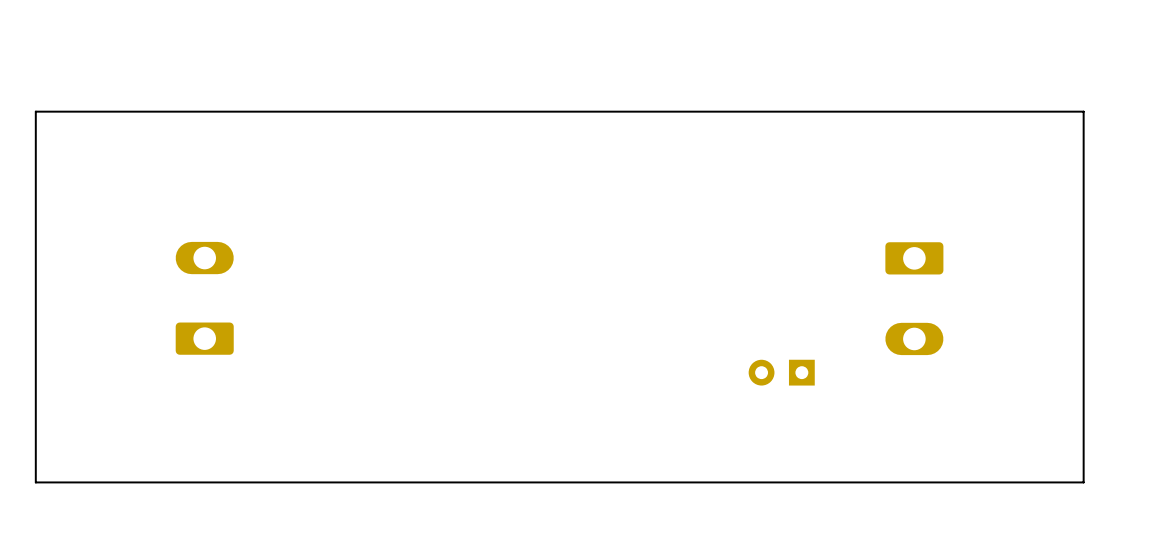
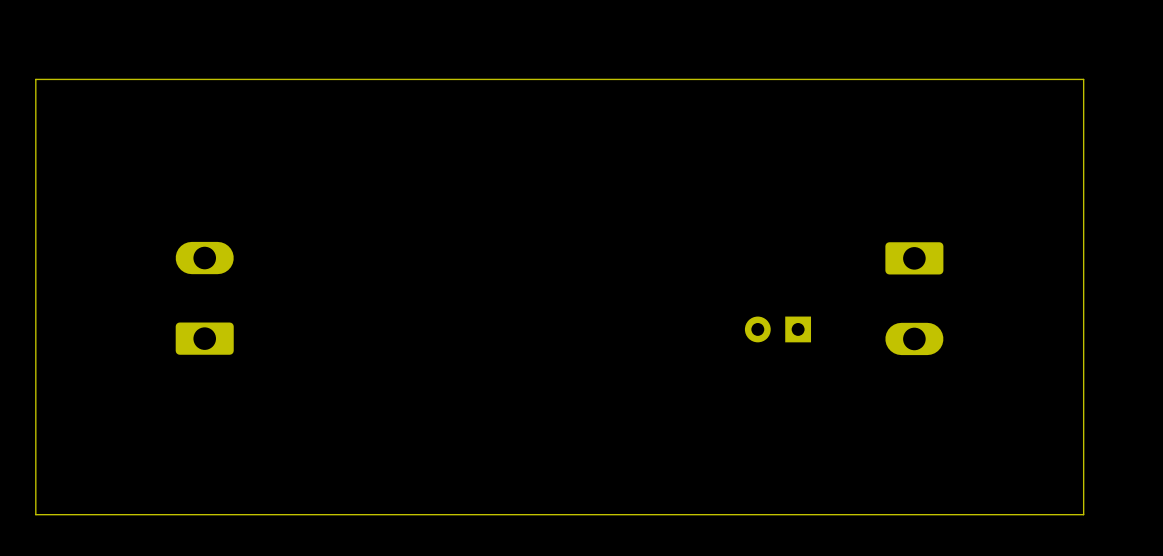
board edge: (1083, 111) (35, 111) -> (1083, 111) (1083, 79) (35, 79) (35, 111)
part position: (781, 372) -> (777, 329)
board edge: (1083, 482) (35, 482) -> (1083, 482) (1083, 514) (35, 514) (35, 482)

